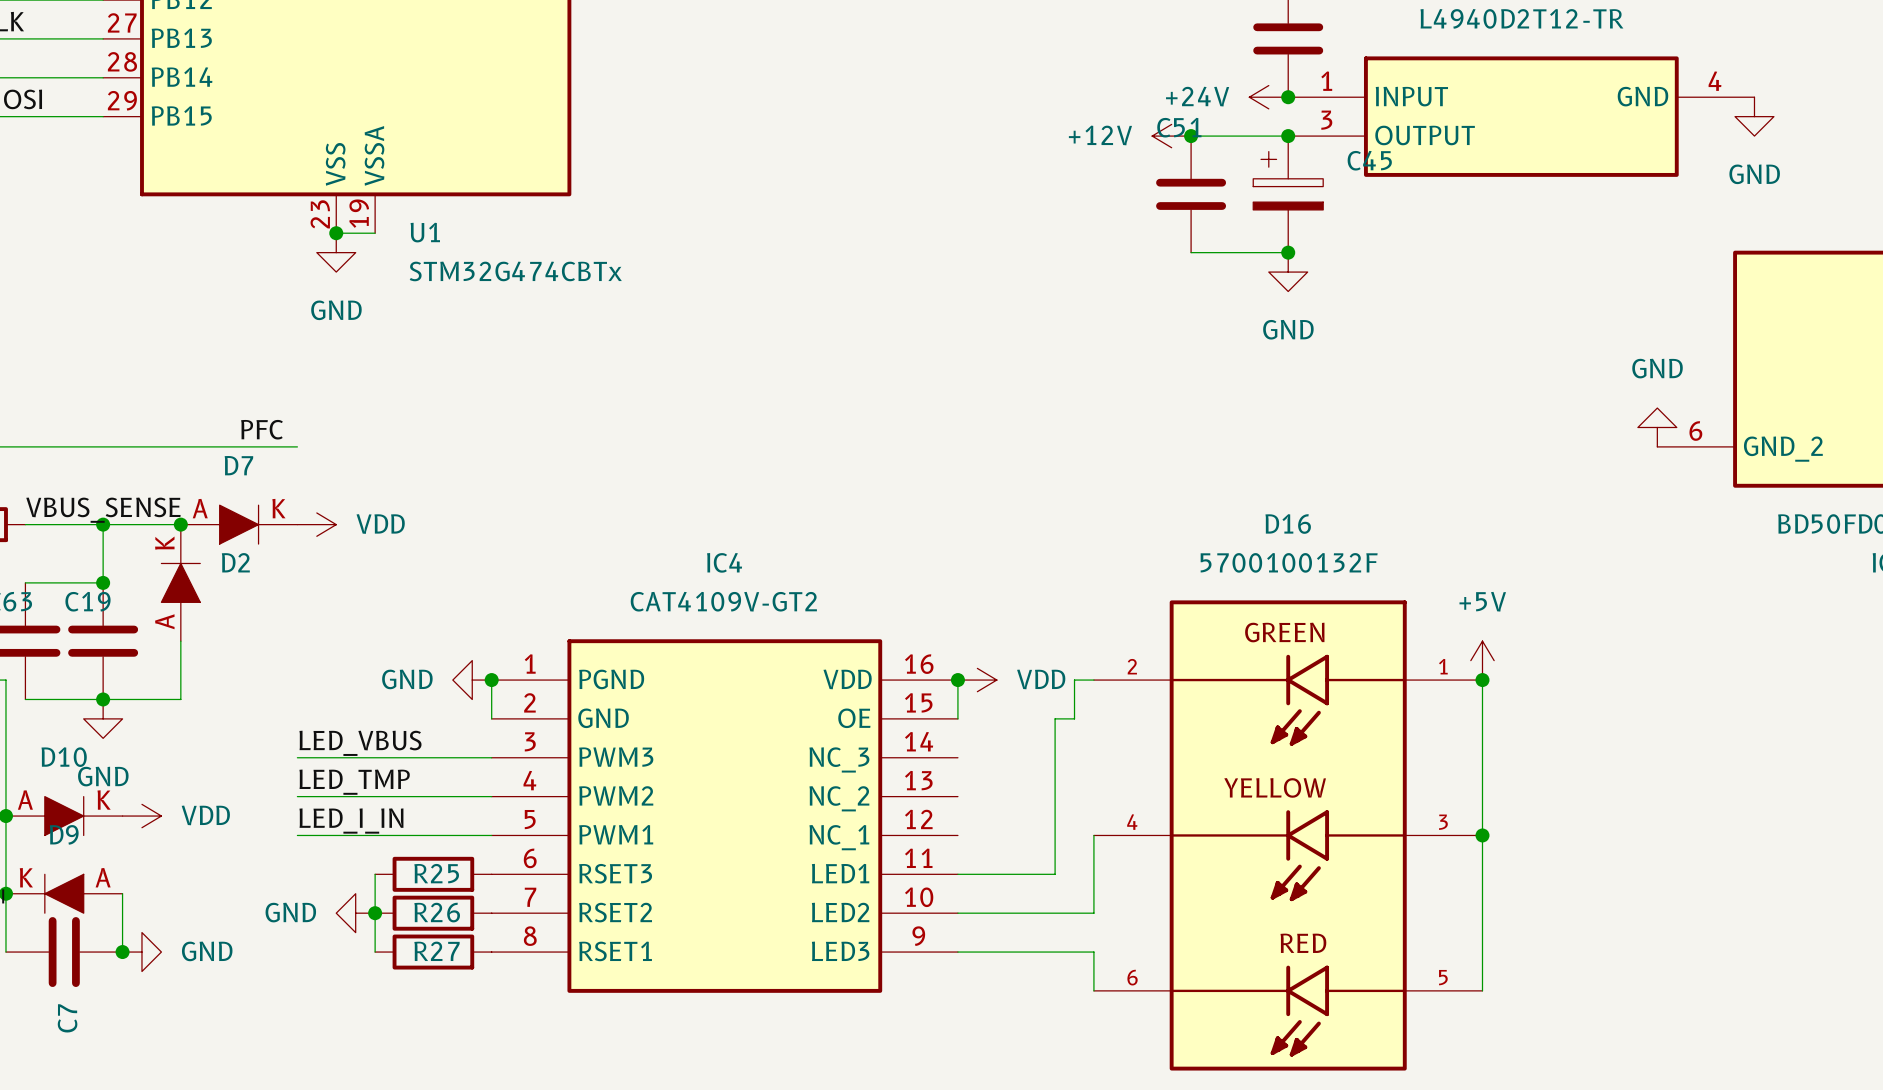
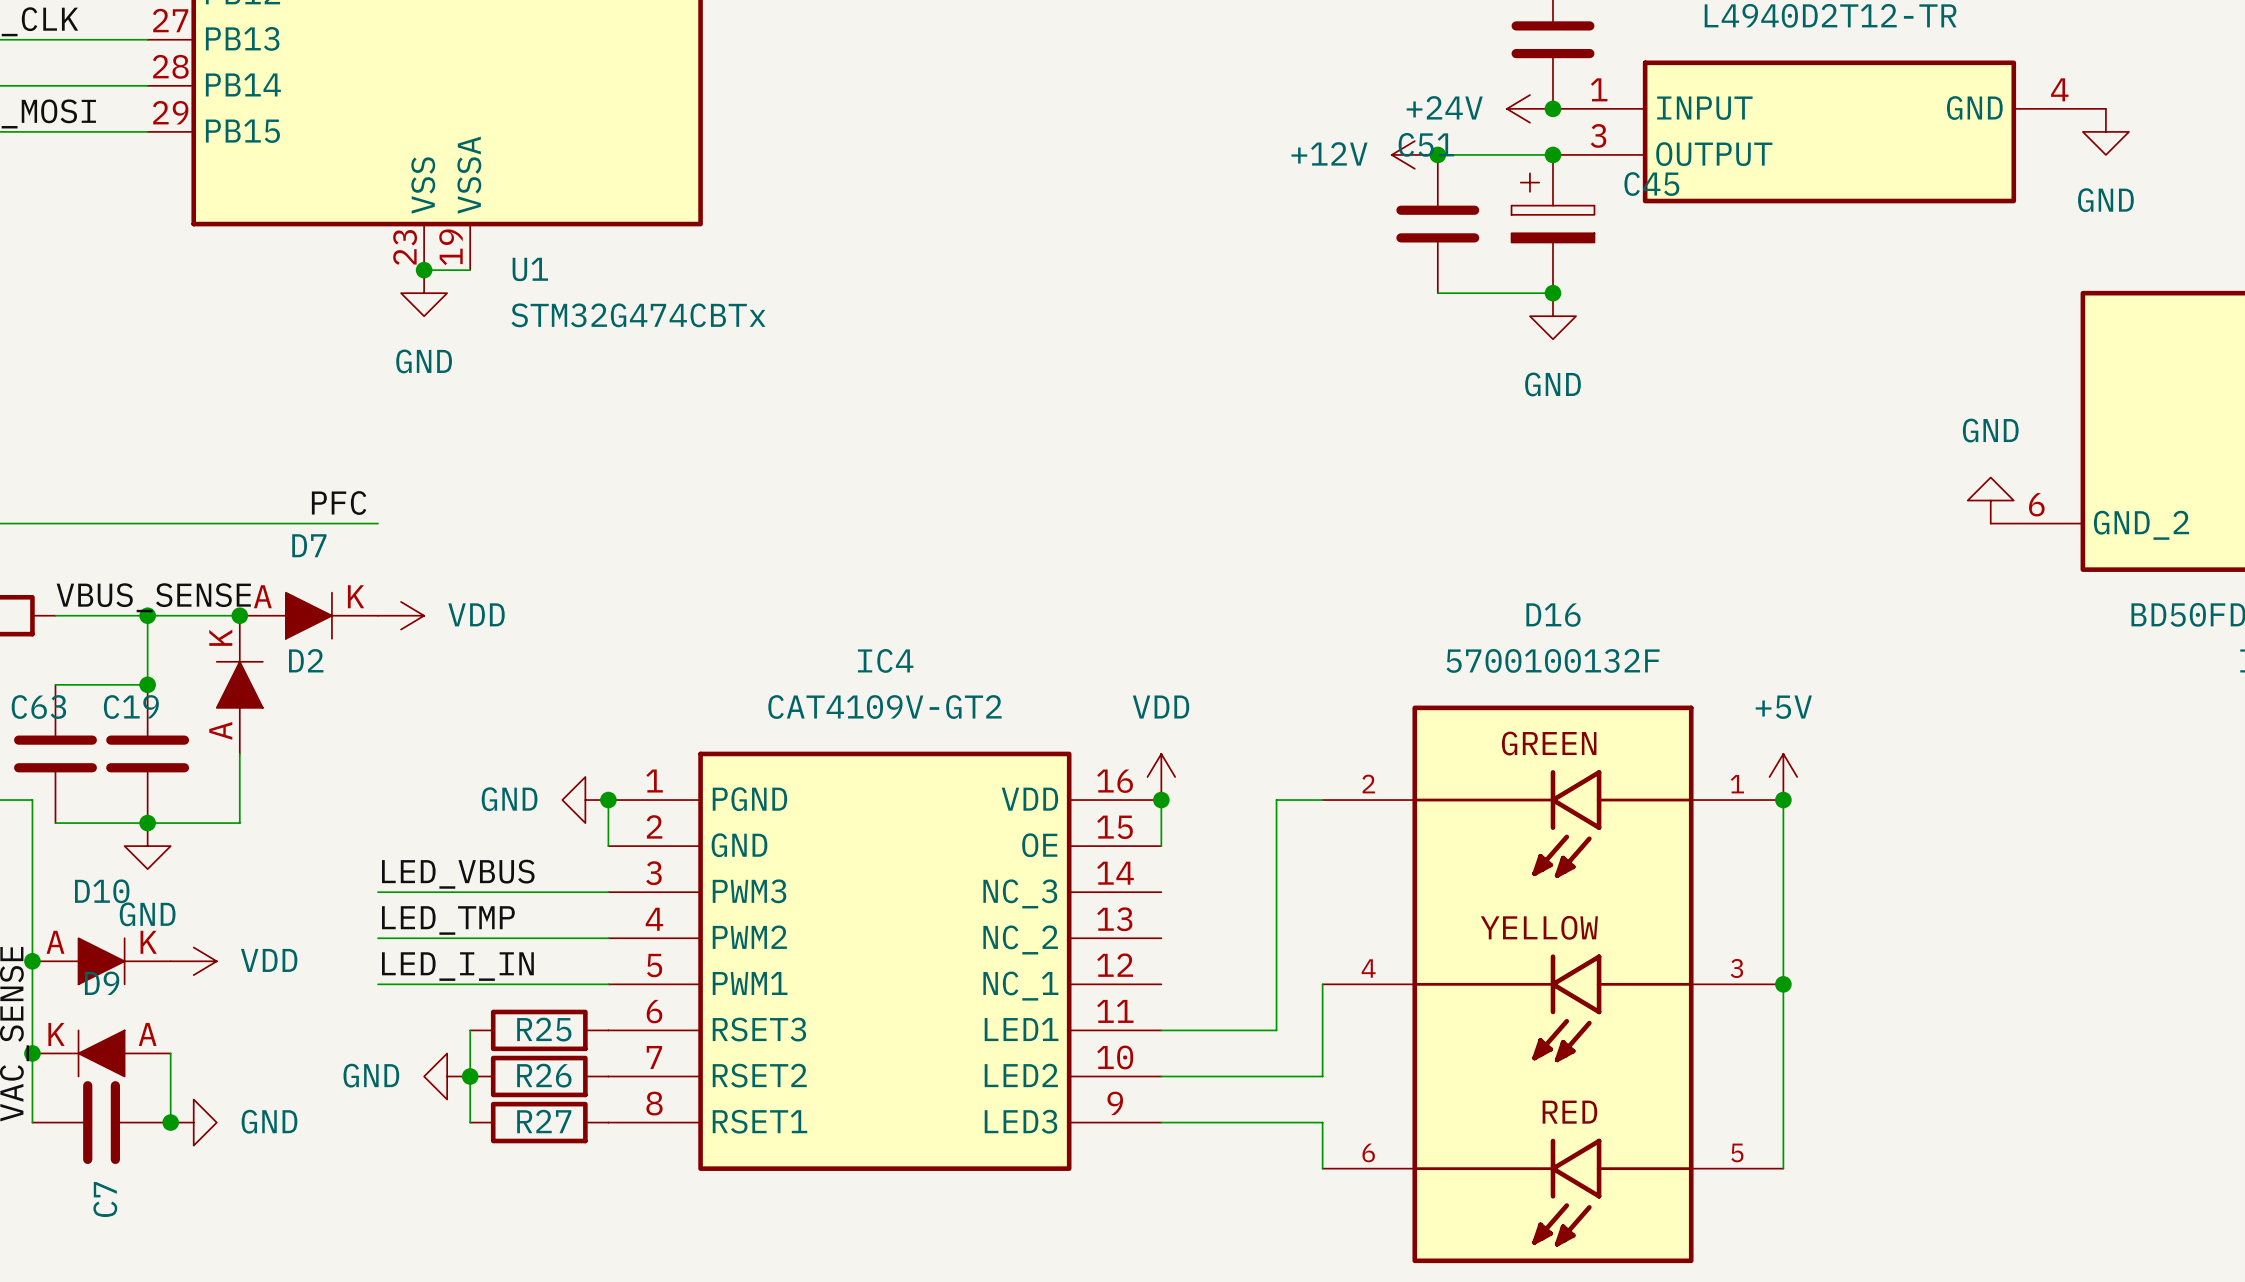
power symbol rotation: 0° (977, 680) -> 90° counterclockwise (1161, 776)
power symbol position: VDD (977, 680) -> VDD (1161, 776)
wire: (1074, 680) (1074, 718) (1055, 718) -> (1299, 800) (1276, 800) (1276, 846)

